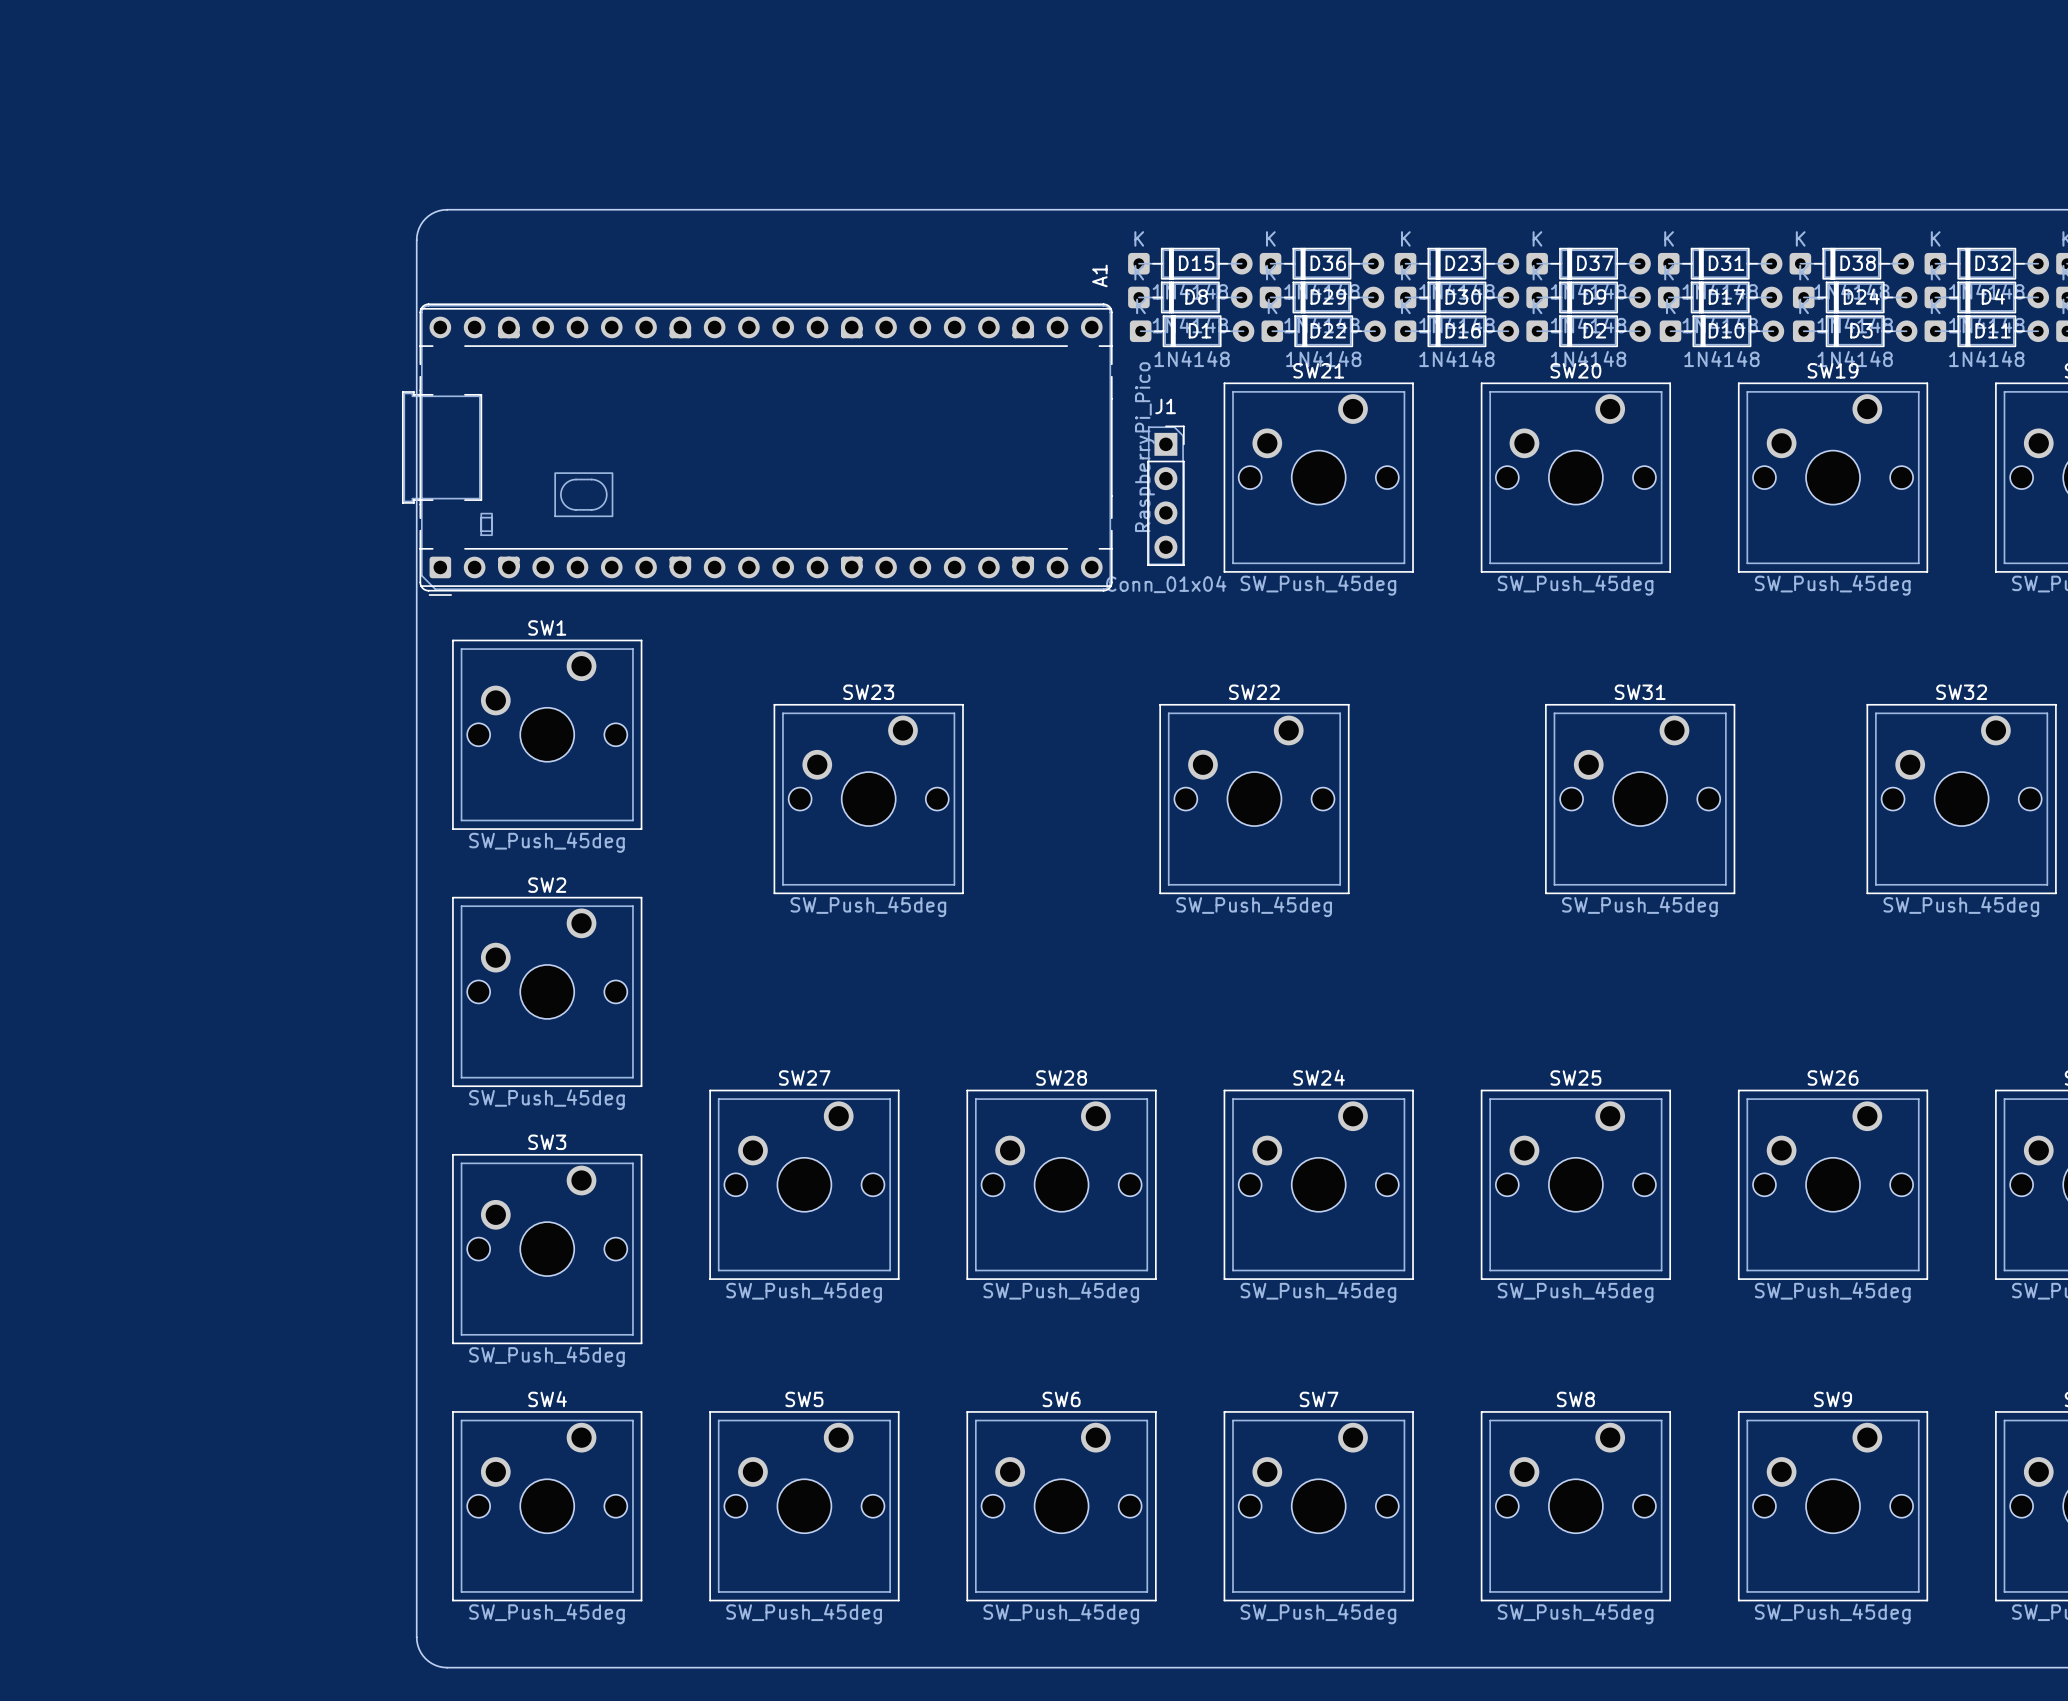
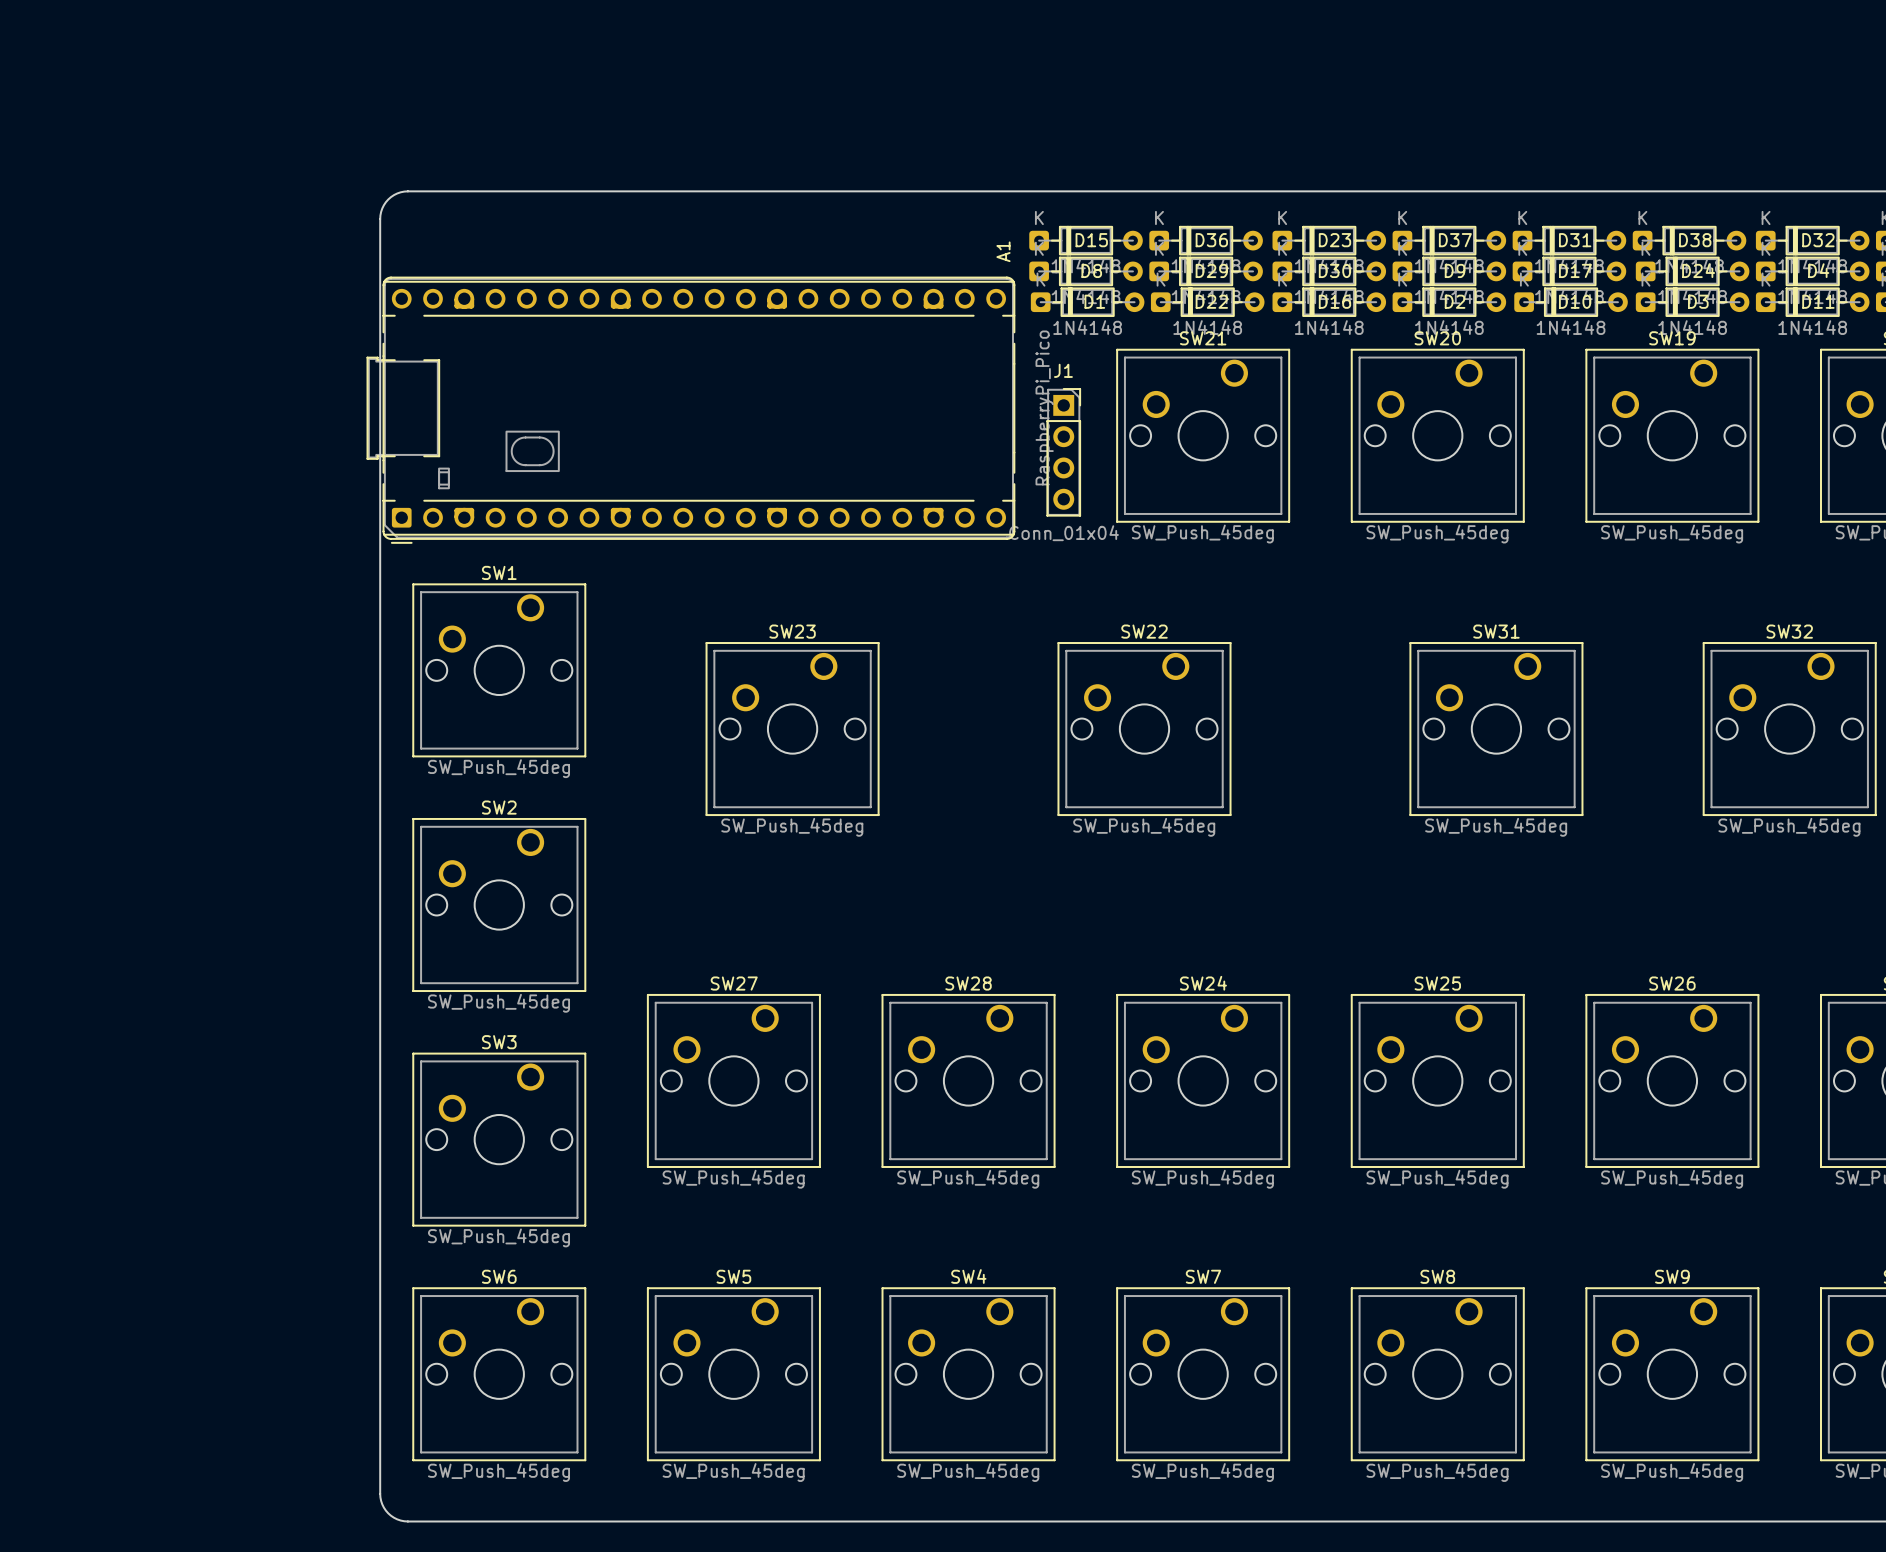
SW4 name: SW4 (547, 1399) -> SW6 (499, 1276)
SW6 name: SW6 (1061, 1399) -> SW4 (968, 1276)

